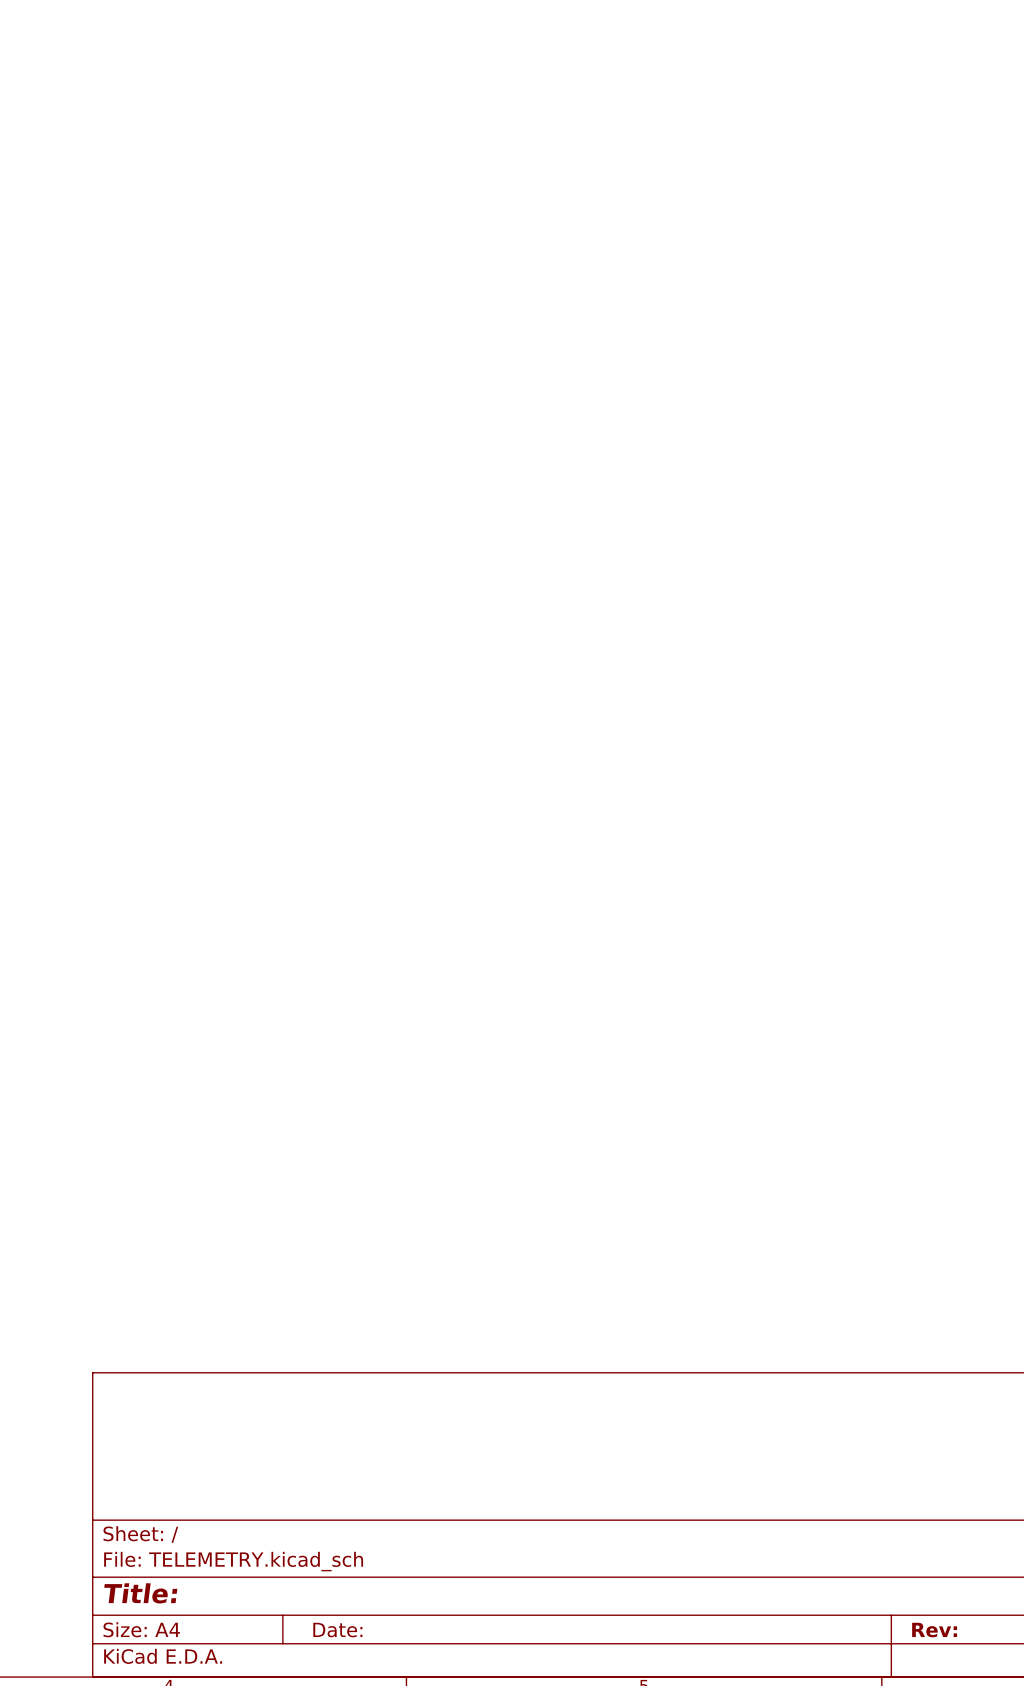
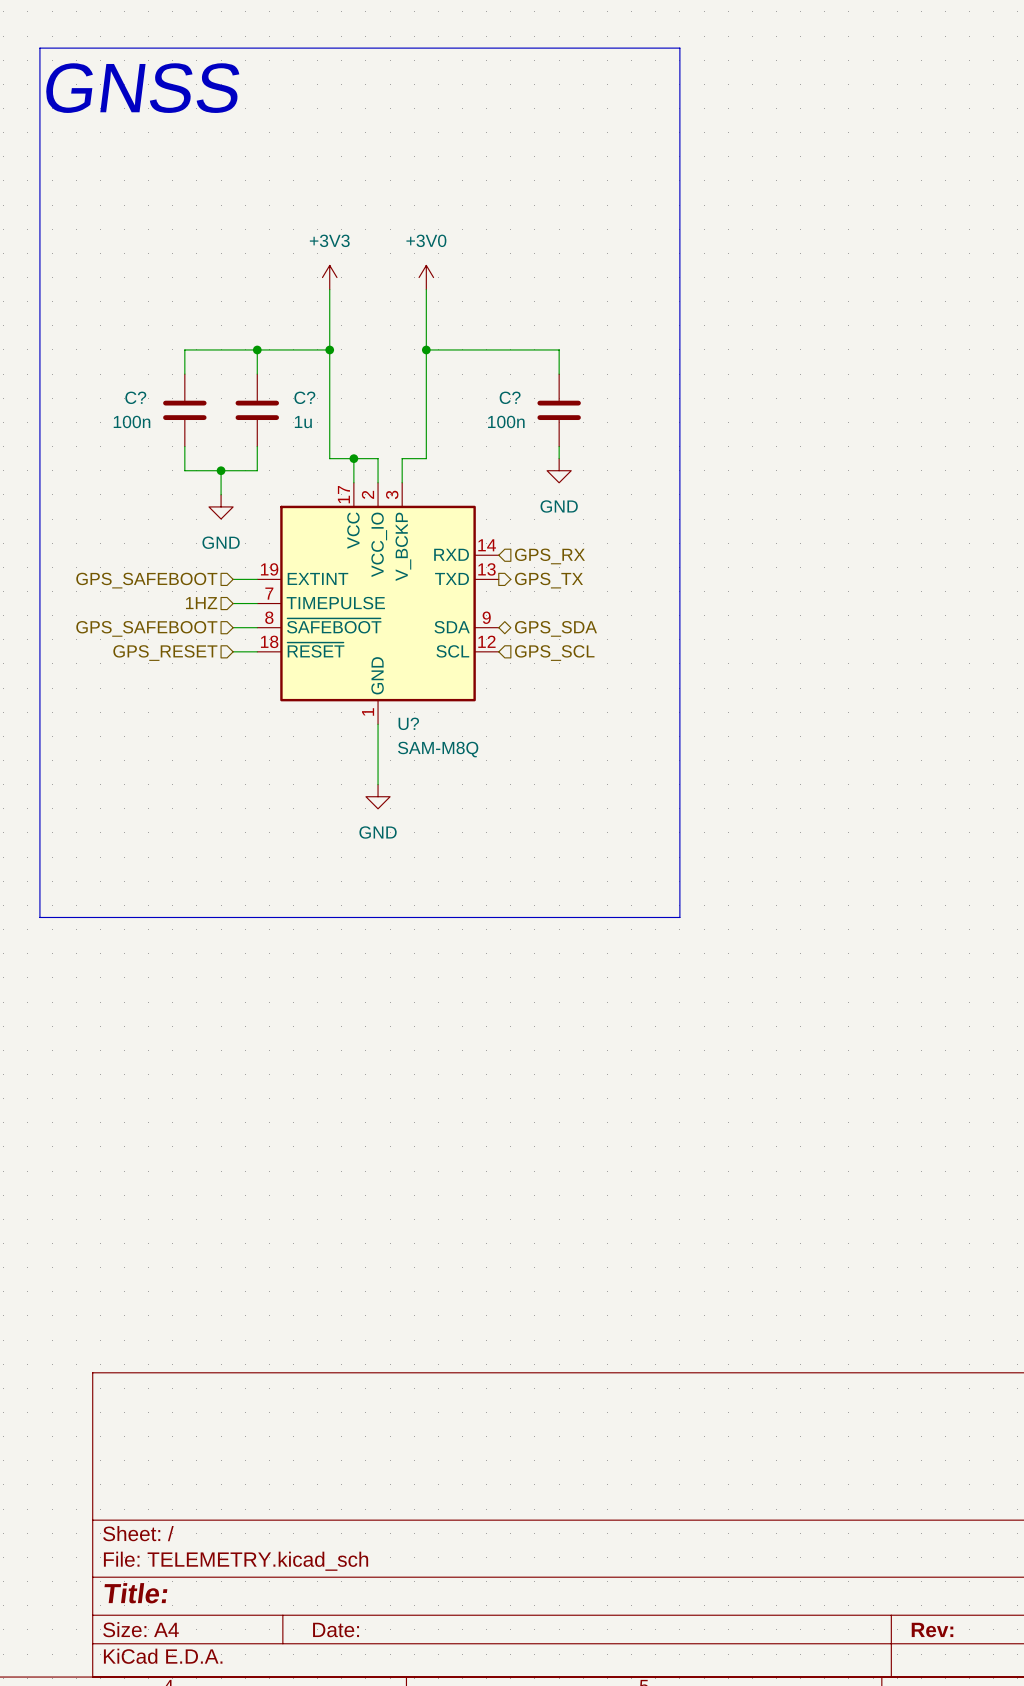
line: none -> (39, 48) (679, 48) (679, 917) (39, 917) (39, 48)
text: none -> GNSS (142, 88)
power symbol: none -> +3V3 (329, 277)
power symbol: none -> +3V0 (426, 277)
wire: none -> (329, 289) (329, 458) (378, 458) (378, 482)
wire: none -> (426, 289) (426, 458) (402, 458) (402, 482)
wire: none -> (257, 349) (257, 374)
junction: none -> (257, 349)
wire: none -> (329, 349) (184, 349) (184, 374)
junction: none -> (329, 349)
wire: none -> (426, 349) (559, 349) (559, 374)
junction: none -> (426, 349)
C?: none -> 100n (184, 410)
C?: none -> 1u (257, 410)
C?: none -> 100n (559, 410)
wire: none -> (184, 446) (184, 470) (257, 470) (257, 446)
wire: none -> (559, 446) (559, 458)
wire: none -> (353, 458) (353, 482)
junction: none -> (353, 458)
wire: none -> (221, 470) (221, 494)
junction: none -> (221, 470)
power symbol: none -> GND (559, 470)
power symbol: none -> GND (221, 506)
hierarchical label: none -> GPS_RX (549, 556)
wire: none -> (233, 579) (257, 579)
hierarchical label: none -> GPS_SAFEBOOT (146, 580)
hierarchical label: none -> GPS_TX (548, 580)
hierarchical label: none -> 1HZ (201, 603)
wire: none -> (233, 603) (257, 603)
U?: none -> SAM-M8Q (378, 603)
wire: none -> (233, 627) (257, 627)
hierarchical label: none -> GPS_SAFEBOOT (146, 628)
hierarchical label: none -> GPS_SDA (555, 628)
wire: none -> (233, 651) (257, 651)
hierarchical label: none -> GPS_RESET (165, 653)
hierarchical label: none -> GPS_SCL (554, 653)
wire: none -> (378, 724) (378, 784)
power symbol: none -> GND (378, 796)

